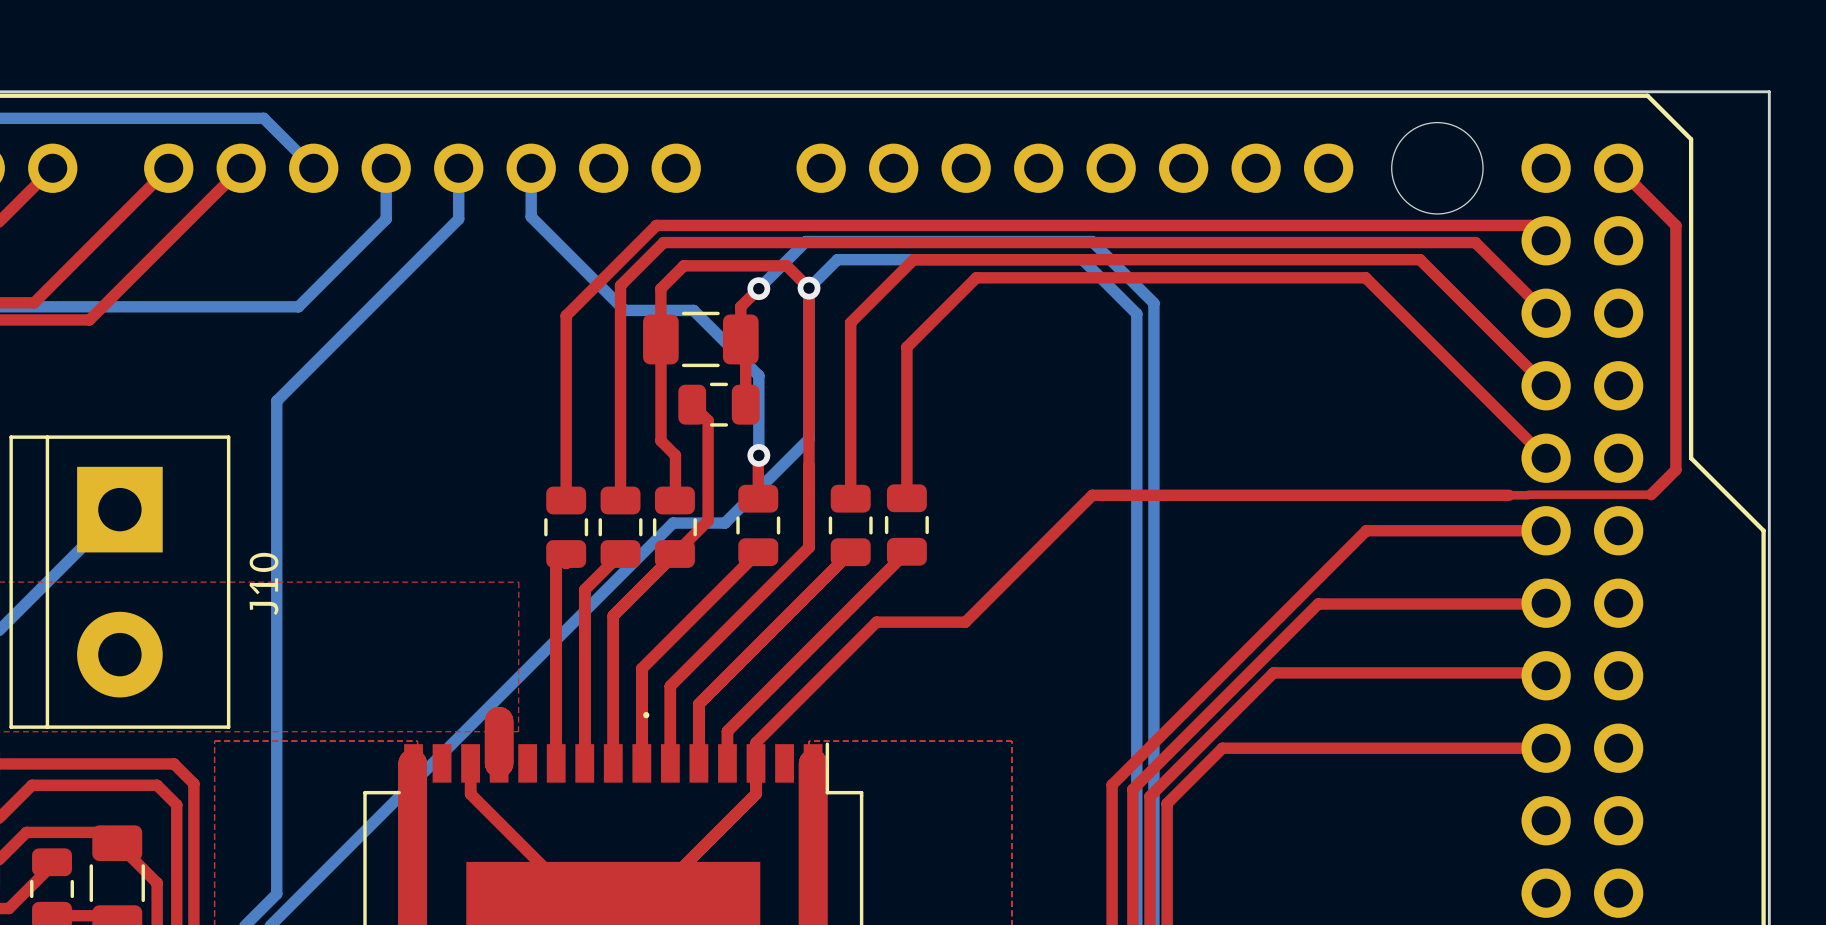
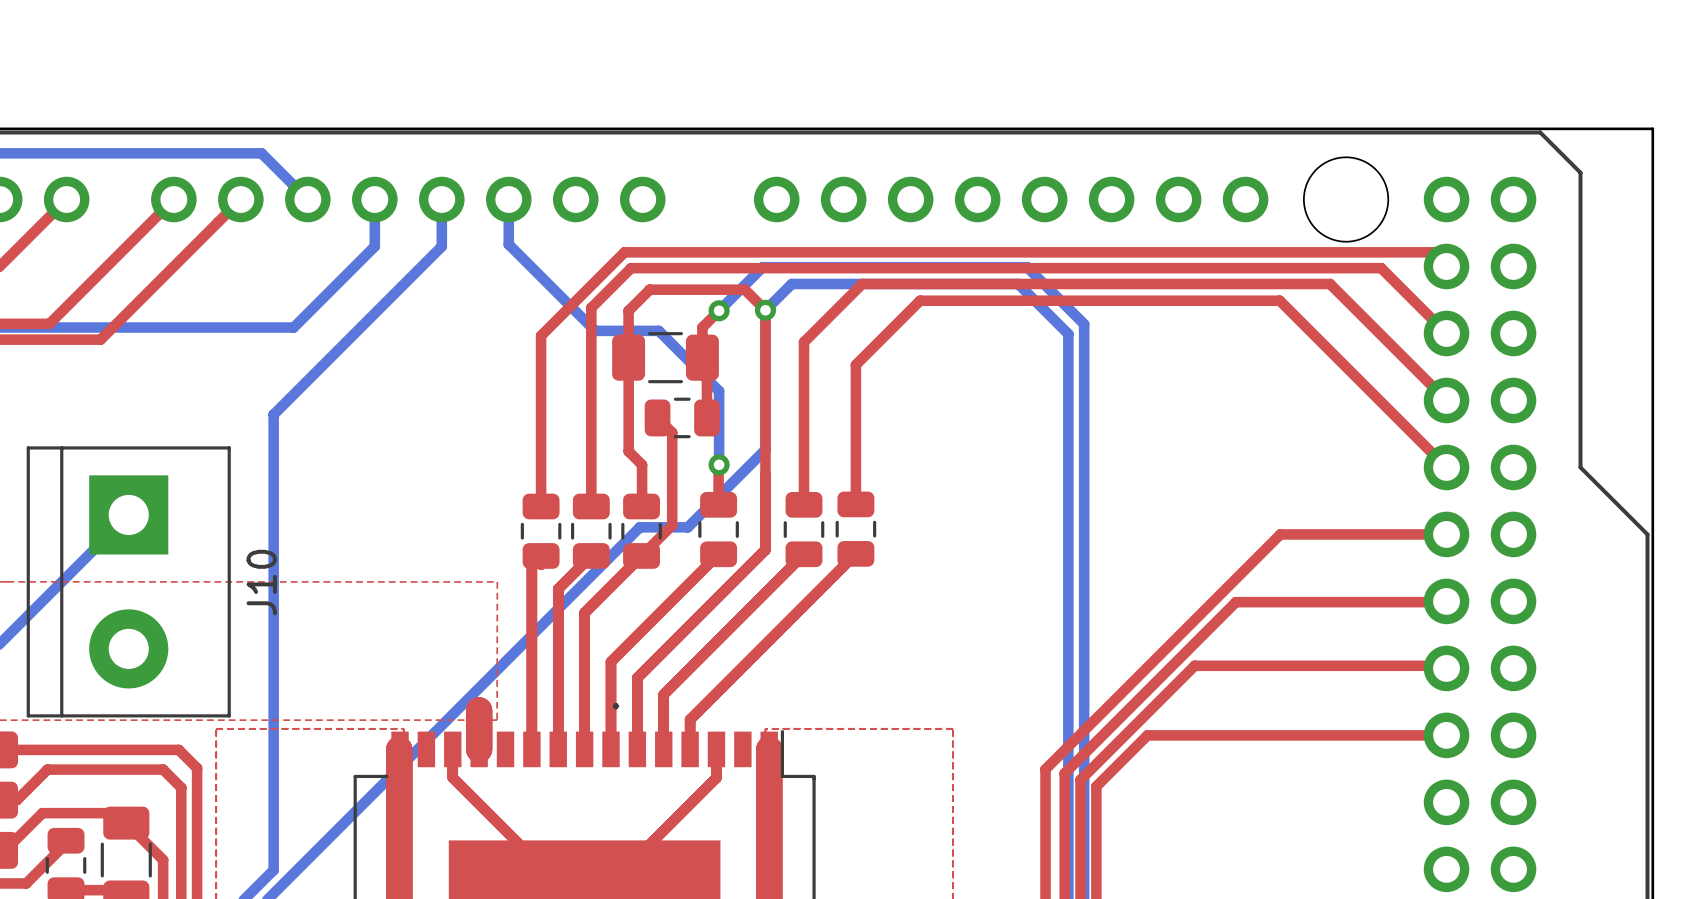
top track: (1618, 168) (1675, 225) (1675, 469) (1651, 494) (1528, 494) -> none
top track: (1528, 495) (1092, 495) (965, 622) (876, 622) (756, 742) (756, 763) -> none

